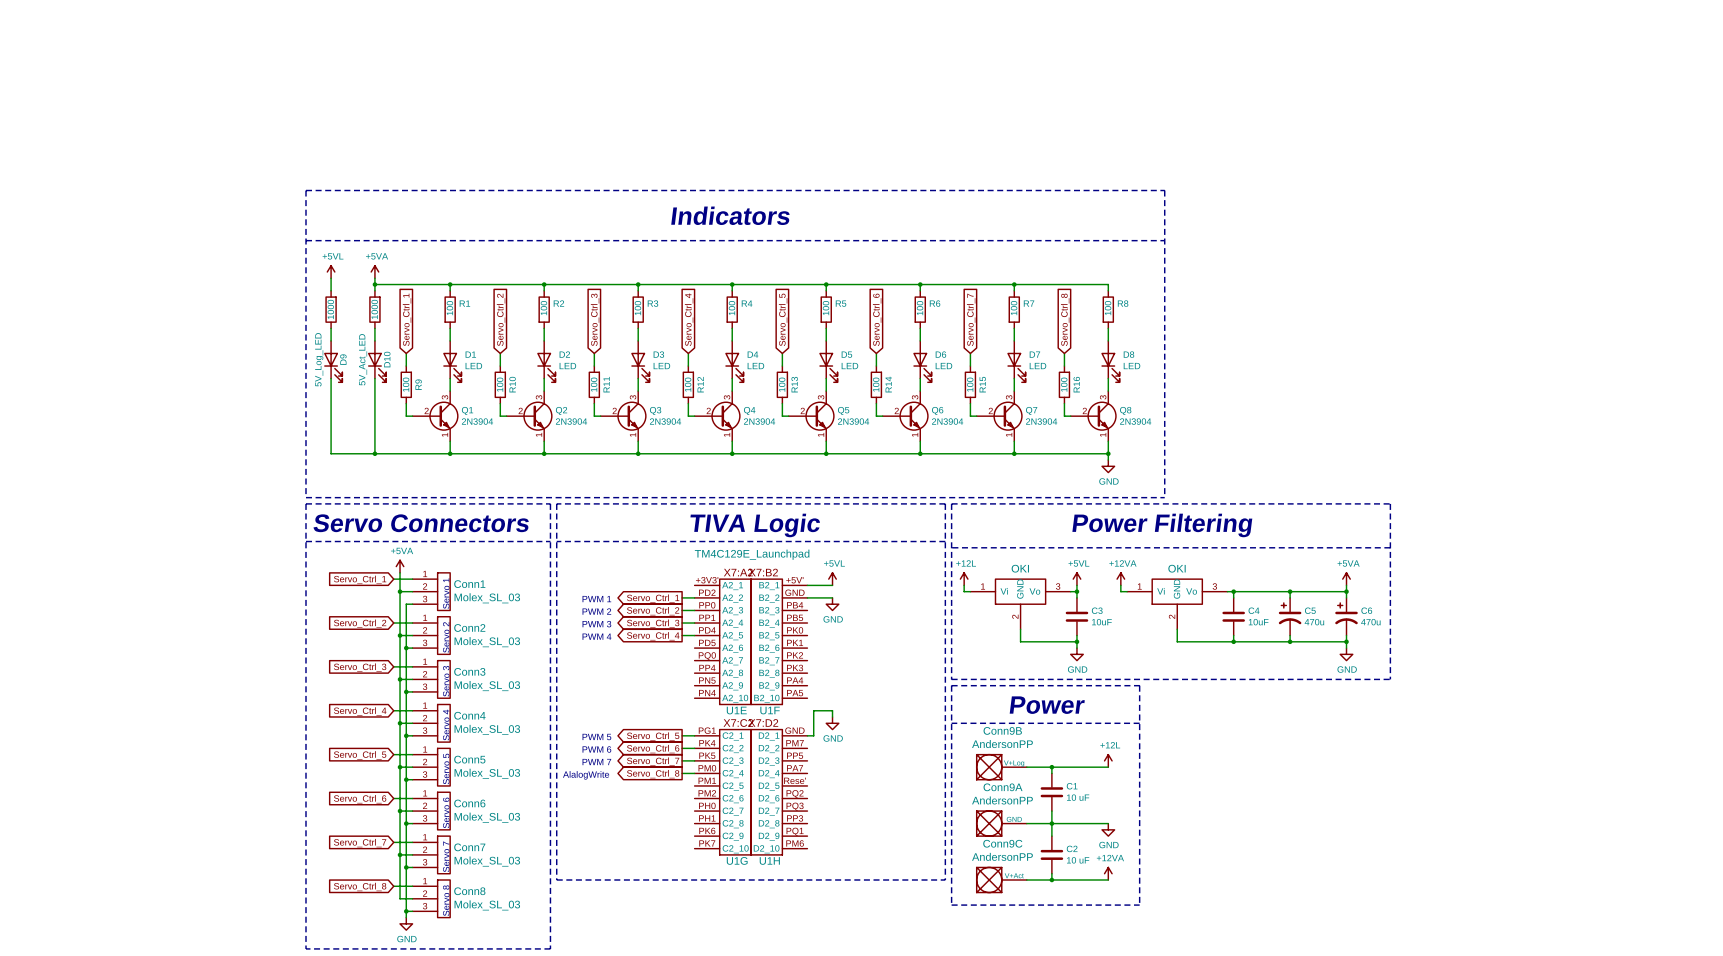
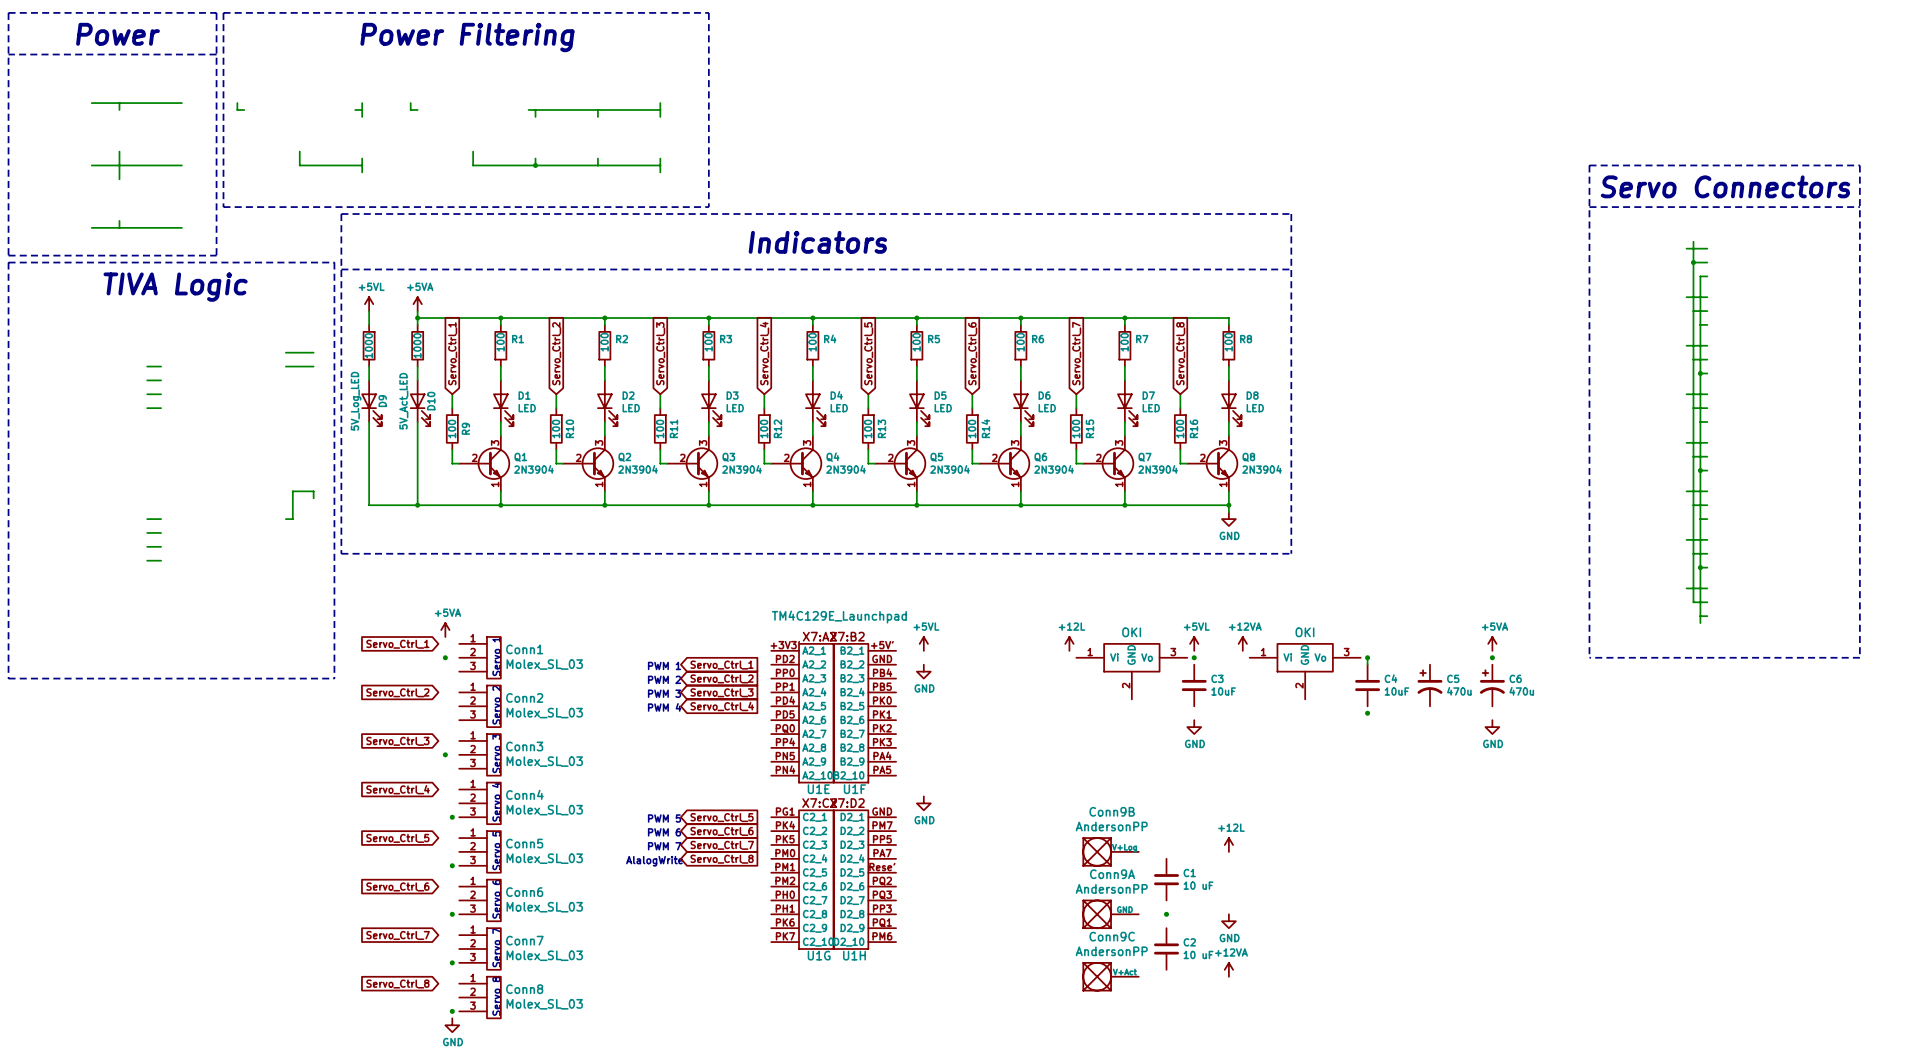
line: none -> (8, 12) (8, 255) (216, 255) (216, 12) (8, 12)
line: none -> (223, 12) (708, 12) (708, 207) (223, 207) (223, 12)
text: none -> Power (118, 34)
text: none -> Power Filtering (467, 37)
line: none -> (8, 54) (216, 54)
wire: none -> (91, 103) (181, 103)
wire: none -> (119, 103) (119, 109)
wire: none -> (237, 103) (237, 109) (244, 109)
wire: none -> (362, 103) (362, 116)
wire: none -> (410, 103) (410, 109) (417, 109)
wire: none -> (660, 103) (660, 116)
wire: none -> (355, 109) (362, 109)
wire: none -> (528, 109) (660, 109)
wire: none -> (535, 109) (535, 116)
wire: none -> (597, 109) (597, 116)
wire: none -> (119, 151) (119, 179)
wire: none -> (299, 151) (299, 165) (362, 165)
wire: none -> (473, 151) (473, 165) (660, 165)
wire: none -> (362, 158) (362, 172)
wire: none -> (535, 158) (535, 165)
wire: none -> (597, 158) (597, 165)
wire: none -> (660, 158) (660, 172)
wire: none -> (91, 165) (181, 165)
junction: none -> (535, 165)
line: none -> (1589, 165) (1859, 165) (1859, 657) (1589, 657) (1589, 165)
text: none -> Servo Connectors (1725, 186)
line: none -> (1589, 207) (1859, 207)
wire: none -> (119, 220) (119, 227)
wire: none -> (91, 227) (181, 227)
wire: none -> (1693, 241) (1693, 602) (1707, 602)
wire: none -> (1686, 248) (1707, 248)
line: none -> (8, 262) (8, 678) (334, 678) (334, 262) (8, 262)
wire: none -> (1693, 262) (1707, 262)
junction: none -> (1693, 262)
wire: none -> (1707, 276) (1700, 276) (1700, 623)
text: none -> TIVA Logic (175, 287)
wire: none -> (1686, 297) (1707, 297)
wire: none -> (1693, 311) (1707, 311)
wire: none -> (1700, 324) (1707, 324)
wire: none -> (1686, 345) (1707, 345)
wire: none -> (285, 352) (313, 352)
wire: none -> (1693, 359) (1707, 359)
wire: none -> (147, 366) (161, 366)
wire: none -> (285, 366) (313, 366)
wire: none -> (1700, 373) (1707, 373)
junction: none -> (1700, 373)
wire: none -> (147, 380) (161, 380)
wire: none -> (147, 394) (161, 394)
wire: none -> (1686, 394) (1707, 394)
wire: none -> (147, 408) (161, 408)
wire: none -> (1693, 408) (1707, 408)
wire: none -> (1700, 422) (1707, 422)
wire: none -> (1686, 442) (1707, 442)
wire: none -> (1693, 456) (1707, 456)
wire: none -> (1700, 470) (1707, 470)
junction: none -> (1700, 470)
wire: none -> (1686, 491) (1707, 491)
wire: none -> (313, 498) (313, 491) (292, 491) (292, 519) (285, 519)
wire: none -> (1693, 505) (1707, 505)
wire: none -> (147, 519) (161, 519)
wire: none -> (1700, 519) (1707, 519)
wire: none -> (147, 532) (161, 532)
wire: none -> (1686, 539) (1707, 539)
wire: none -> (147, 546) (161, 546)
wire: none -> (1693, 553) (1707, 553)
wire: none -> (147, 560) (161, 560)
line: (305, 503) (550, 503) (550, 948) (305, 948) (305, 503) -> none
line: (556, 503) (945, 503) (945, 880) (556, 880) (556, 503) -> none
line: (951, 503) (1390, 503) (1390, 679) (951, 679) (951, 503) -> none
wire: none -> (1700, 567) (1707, 567)
junction: none -> (1700, 567)
text: Servo Connectors (421, 523) -> none
text: TIVA Logic (755, 525) -> none
text: Power Filtering (1162, 525) -> none
wire: none -> (1686, 588) (1707, 588)
line: (305, 541) (550, 541) -> none
line: (556, 541) (945, 541) -> none
line: (951, 547) (1390, 547) -> none
wire: none -> (1700, 616) (1707, 616)
wire: (400, 572) (400, 898) (412, 898) -> none
wire: (393, 579) (412, 579) -> none
wire: (807, 585) (832, 585) -> none
wire: (964, 585) (964, 591) (970, 591) -> none
wire: (1076, 585) (1076, 597) -> none
wire: (1120, 585) (1120, 591) (1127, 591) -> none
wire: (1346, 585) (1346, 597) -> none
wire: (400, 591) (412, 591) -> none
wire: (1070, 591) (1076, 591) -> none
wire: (1227, 591) (1346, 591) -> none
wire: (1290, 591) (1290, 597) -> none
junction: (1290, 591) -> none
wire: (682, 597) (694, 597) -> none
wire: (807, 597) (832, 597) -> none
wire: (412, 604) (406, 604) (406, 917) -> none
wire: (682, 610) (694, 610) -> none
wire: (393, 623) (412, 623) -> none
wire: (682, 623) (694, 623) -> none
wire: (1020, 629) (1020, 641) (1076, 641) -> none
wire: (1177, 629) (1177, 641) (1346, 641) -> none
wire: (400, 635) (412, 635) -> none
junction: (400, 635) -> none
wire: (682, 635) (694, 635) -> none
wire: (1076, 635) (1076, 648) -> none
wire: (1233, 635) (1233, 641) -> none
wire: (1290, 635) (1290, 641) -> none
wire: (1346, 635) (1346, 648) -> none
junction: (1076, 641) -> none
junction: (1290, 641) -> none
junction: (1346, 641) -> none
wire: (406, 648) (412, 648) -> none
junction: (406, 648) -> none
wire: (393, 666) (412, 666) -> none
wire: (400, 679) (412, 679) -> none
line: (951, 685) (951, 905) (1139, 905) (1139, 685) (951, 685) -> none
wire: (406, 691) (412, 691) -> none
junction: (406, 691) -> none
text: Power (1047, 705) -> none
wire: (393, 710) (412, 710) -> none
wire: (832, 717) (832, 710) (813, 710) (813, 735) (807, 735) -> none
wire: (400, 723) (412, 723) -> none
junction: (400, 723) -> none
line: (951, 723) (1139, 723) -> none
wire: (406, 735) (412, 735) -> none
wire: (682, 735) (694, 735) -> none
wire: (682, 748) (694, 748) -> none
wire: (393, 754) (412, 754) -> none
wire: (682, 760) (694, 760) -> none
wire: (400, 767) (412, 767) -> none
junction: (400, 767) -> none
wire: (1026, 767) (1108, 767) -> none
wire: (1051, 767) (1051, 773) -> none
junction: (1051, 767) -> none
wire: (682, 773) (694, 773) -> none
wire: (406, 779) (412, 779) -> none
wire: (393, 798) (412, 798) -> none
wire: (400, 811) (412, 811) -> none
junction: (400, 811) -> none
wire: (1051, 811) (1051, 836) -> none
wire: (406, 823) (412, 823) -> none
wire: (1026, 823) (1108, 823) -> none
wire: (393, 842) (412, 842) -> none
wire: (400, 854) (412, 854) -> none
junction: (400, 854) -> none
wire: (406, 867) (412, 867) -> none
wire: (1051, 873) (1051, 880) -> none
wire: (1026, 880) (1108, 880) -> none
junction: (1051, 880) -> none
wire: (393, 886) (412, 886) -> none
wire: (406, 911) (412, 911) -> none

